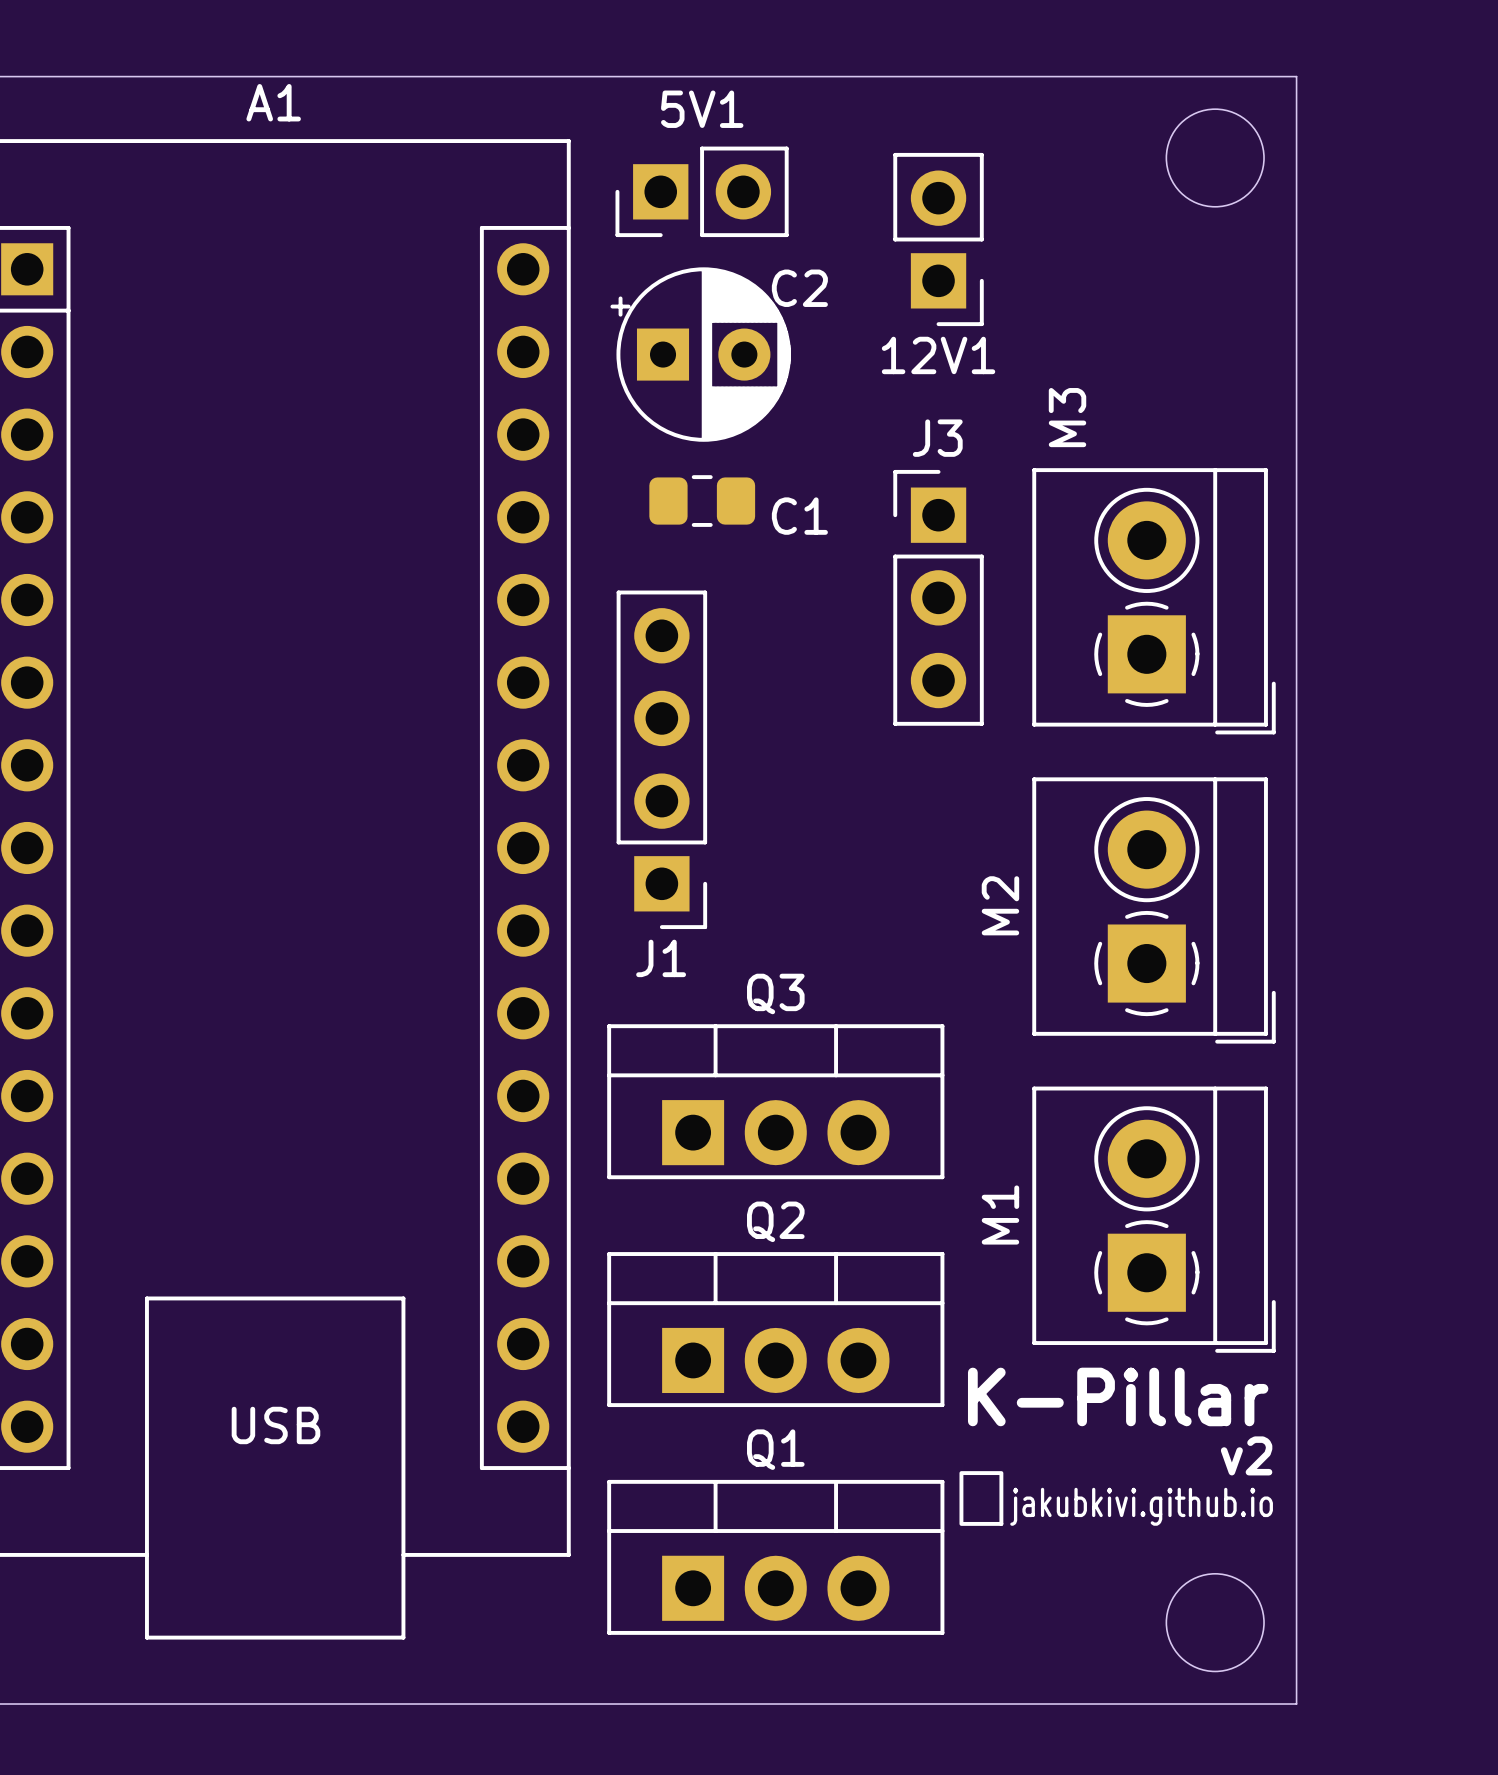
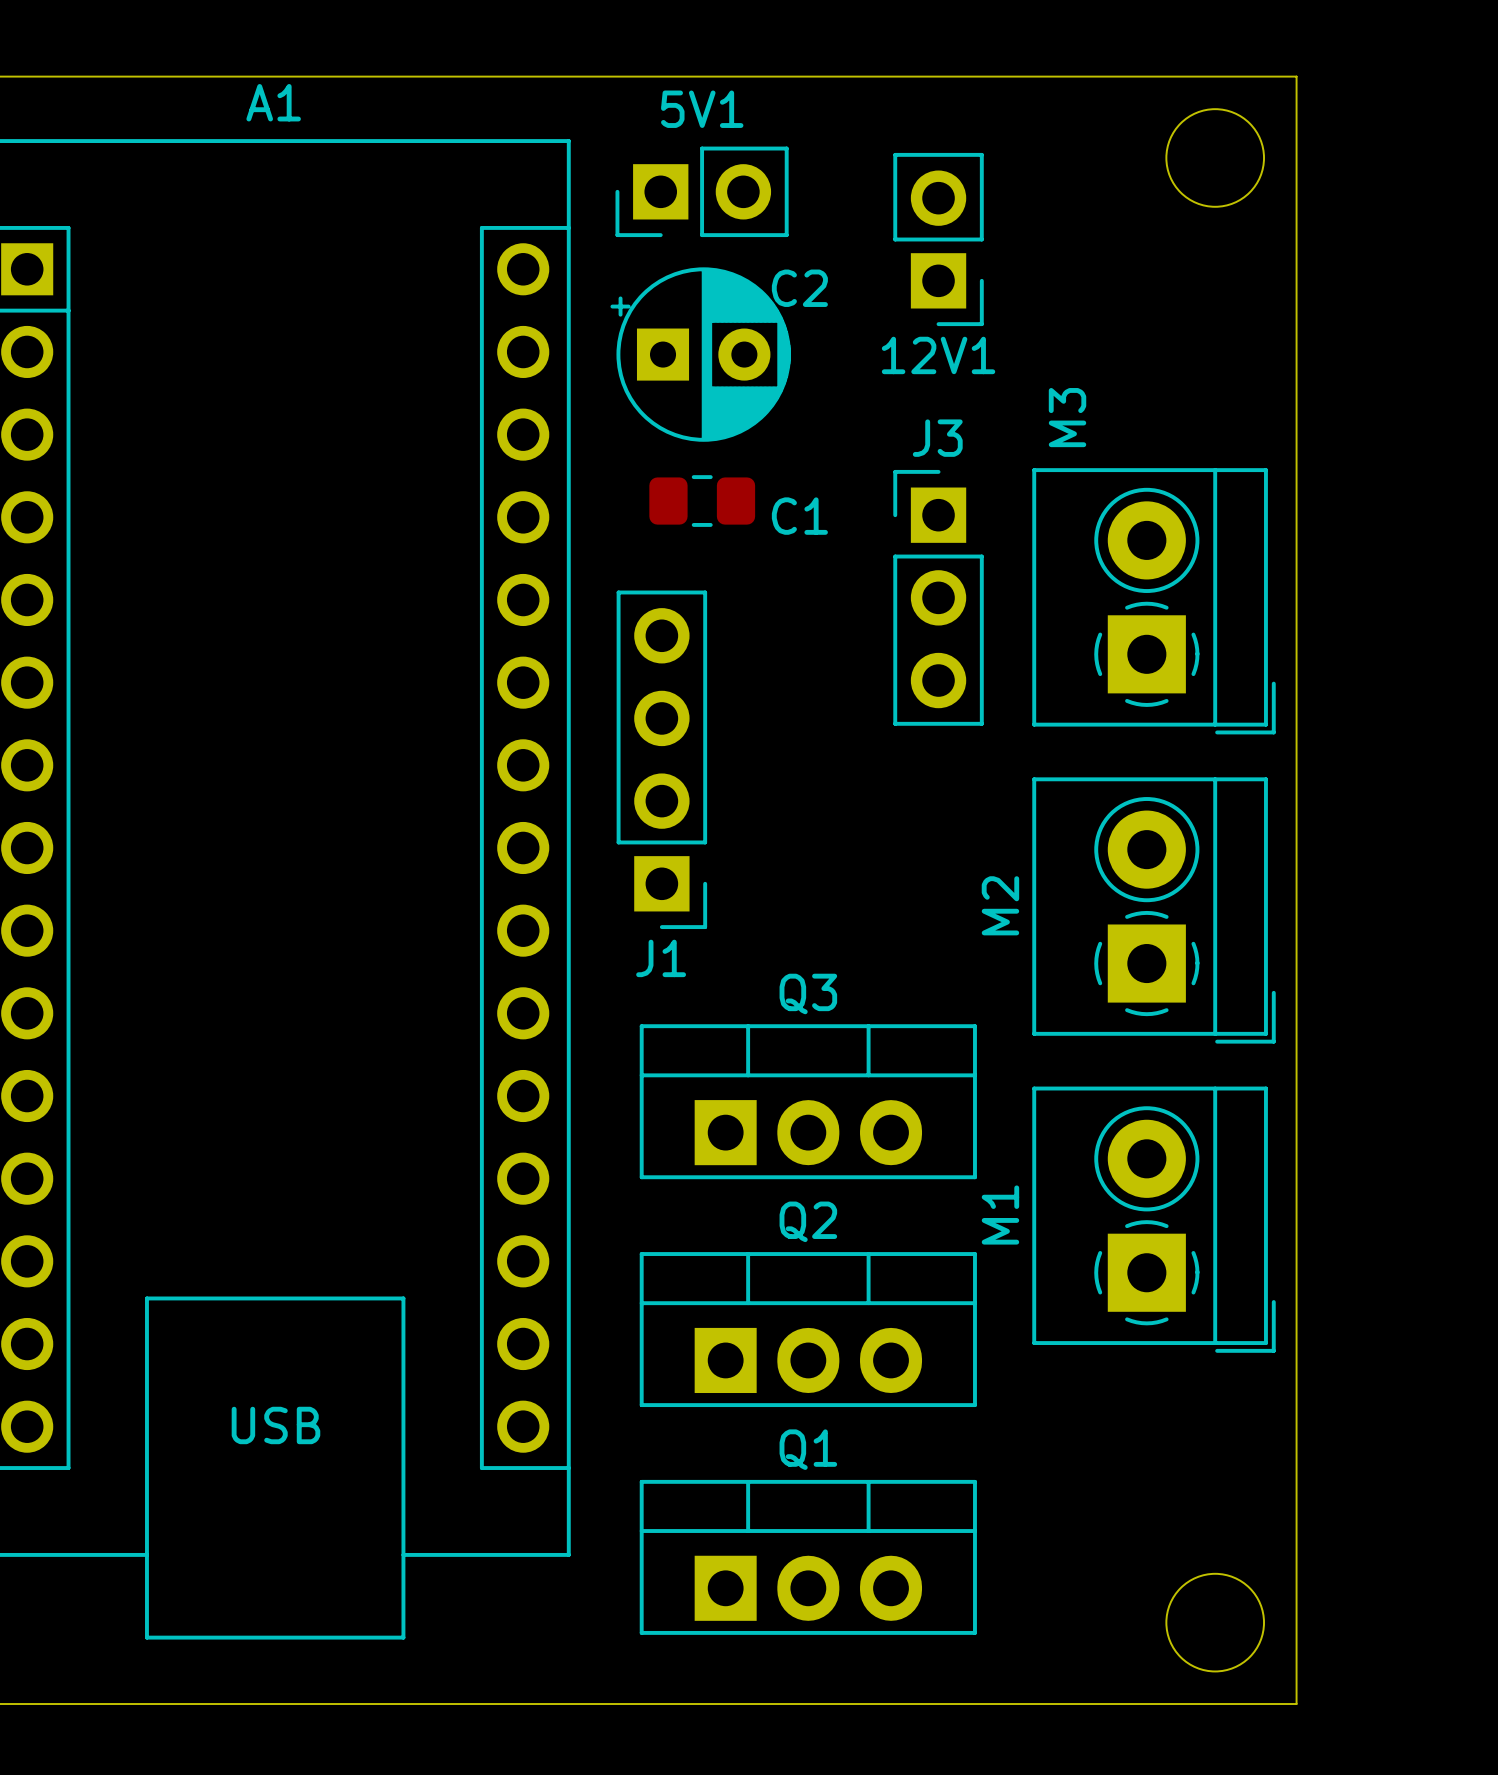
Q3 position: (775, 1101) -> (808, 1101)
Q2 position: (775, 1329) -> (808, 1329)
text: K-Pillar (1118, 1396) -> none
text: v2 (1246, 1455) -> none
drawing: [959, 1471, 1004, 1526] -> none
Q1 position: (775, 1557) -> (808, 1557)

